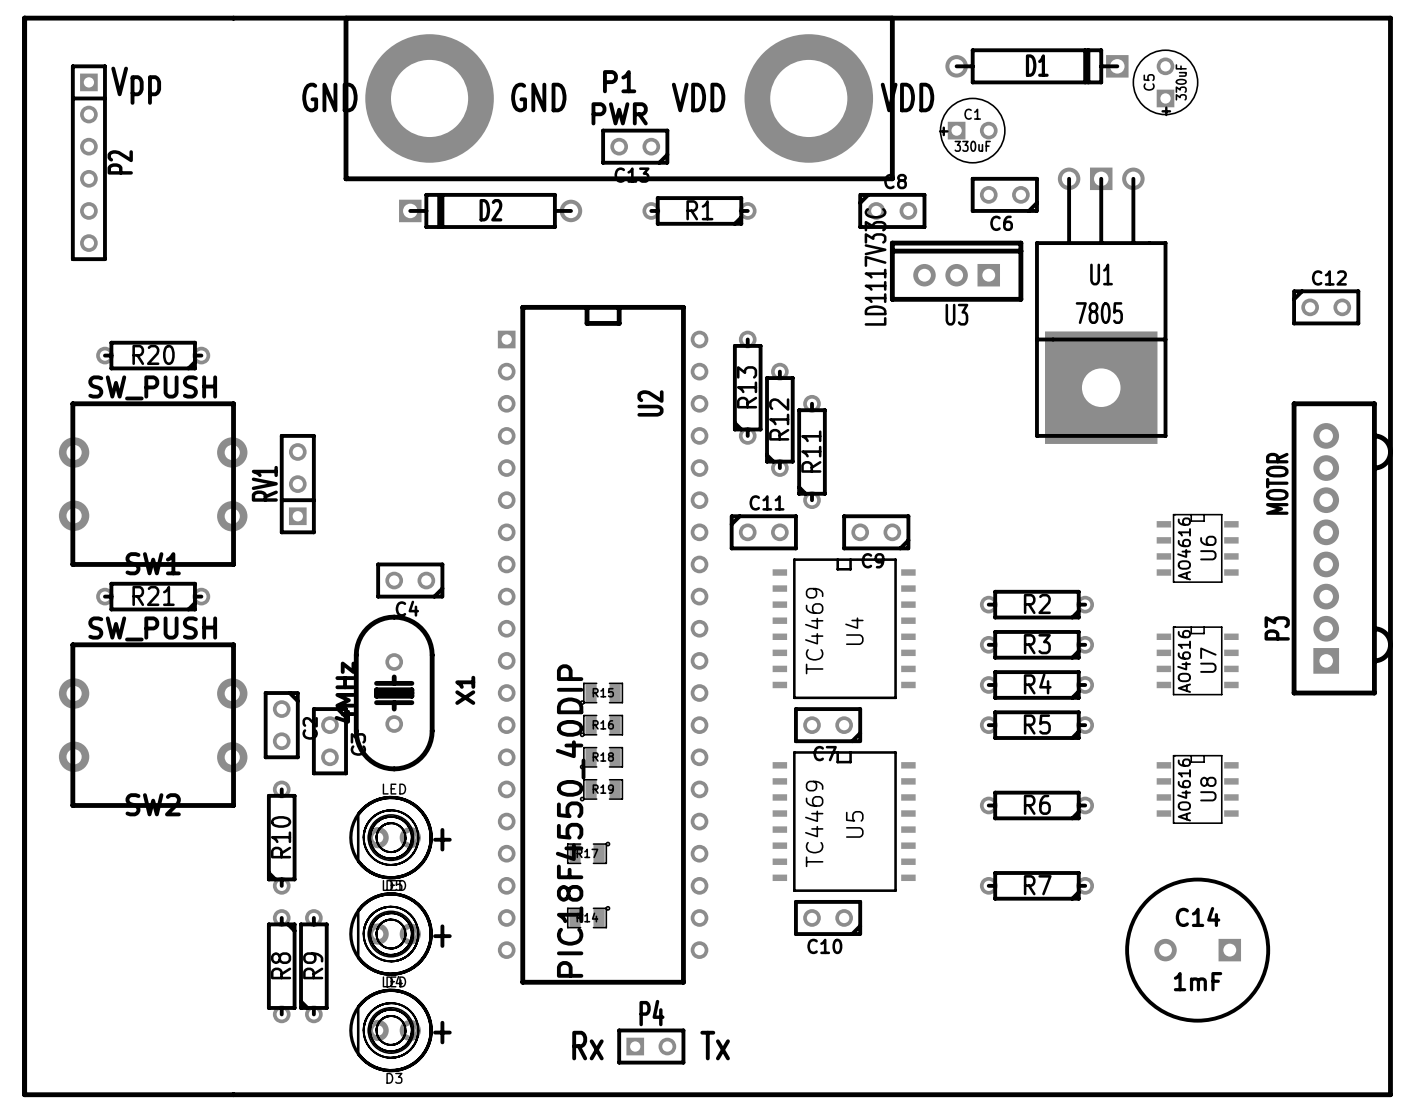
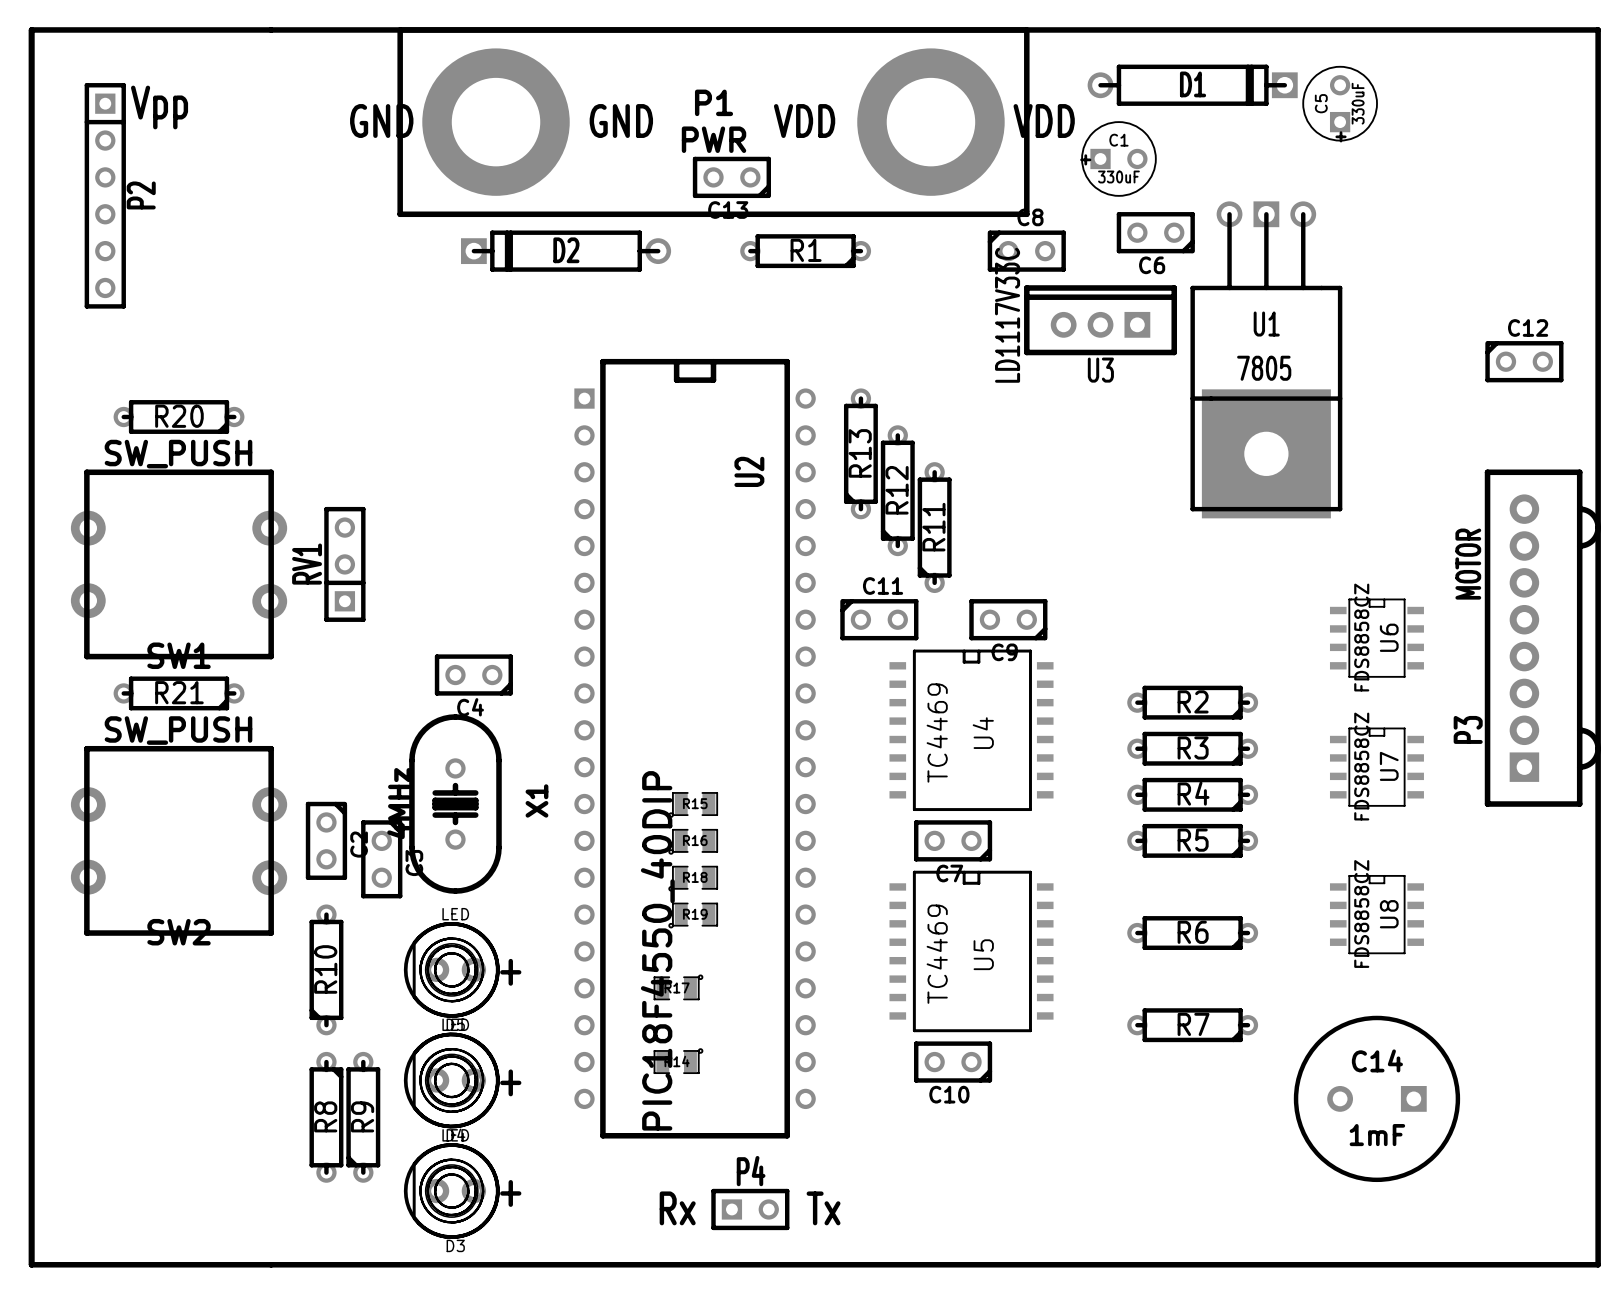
U6 value: AO4616 (1184, 548) -> FDS8858CZ (1361, 637)
U7 value: AO4616 (1184, 661) -> FDS8858CZ (1361, 766)
U8 value: AO4616 (1184, 789) -> FDS8858CZ (1361, 913)

